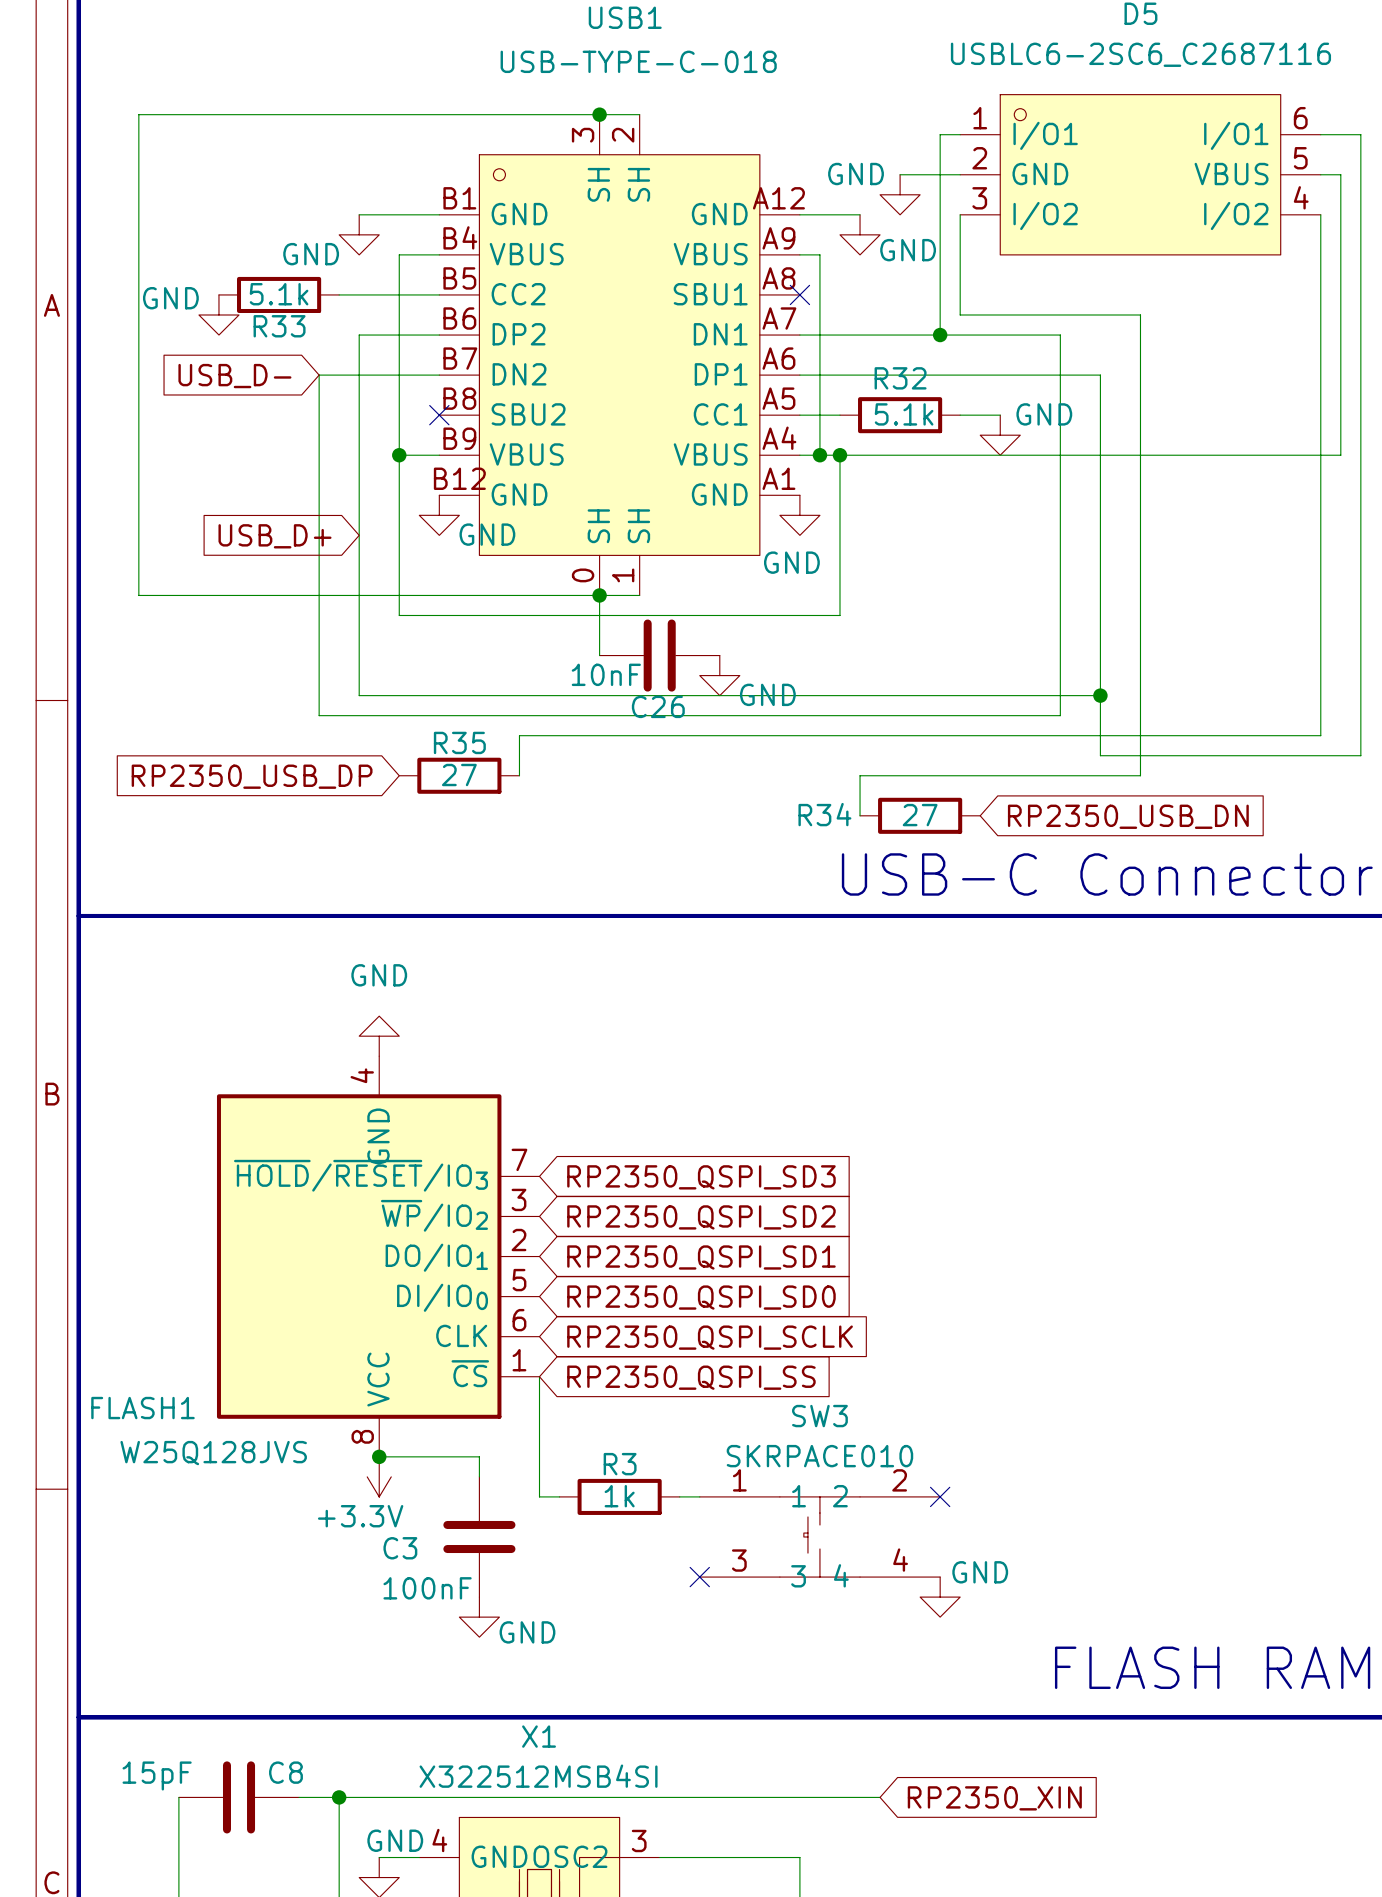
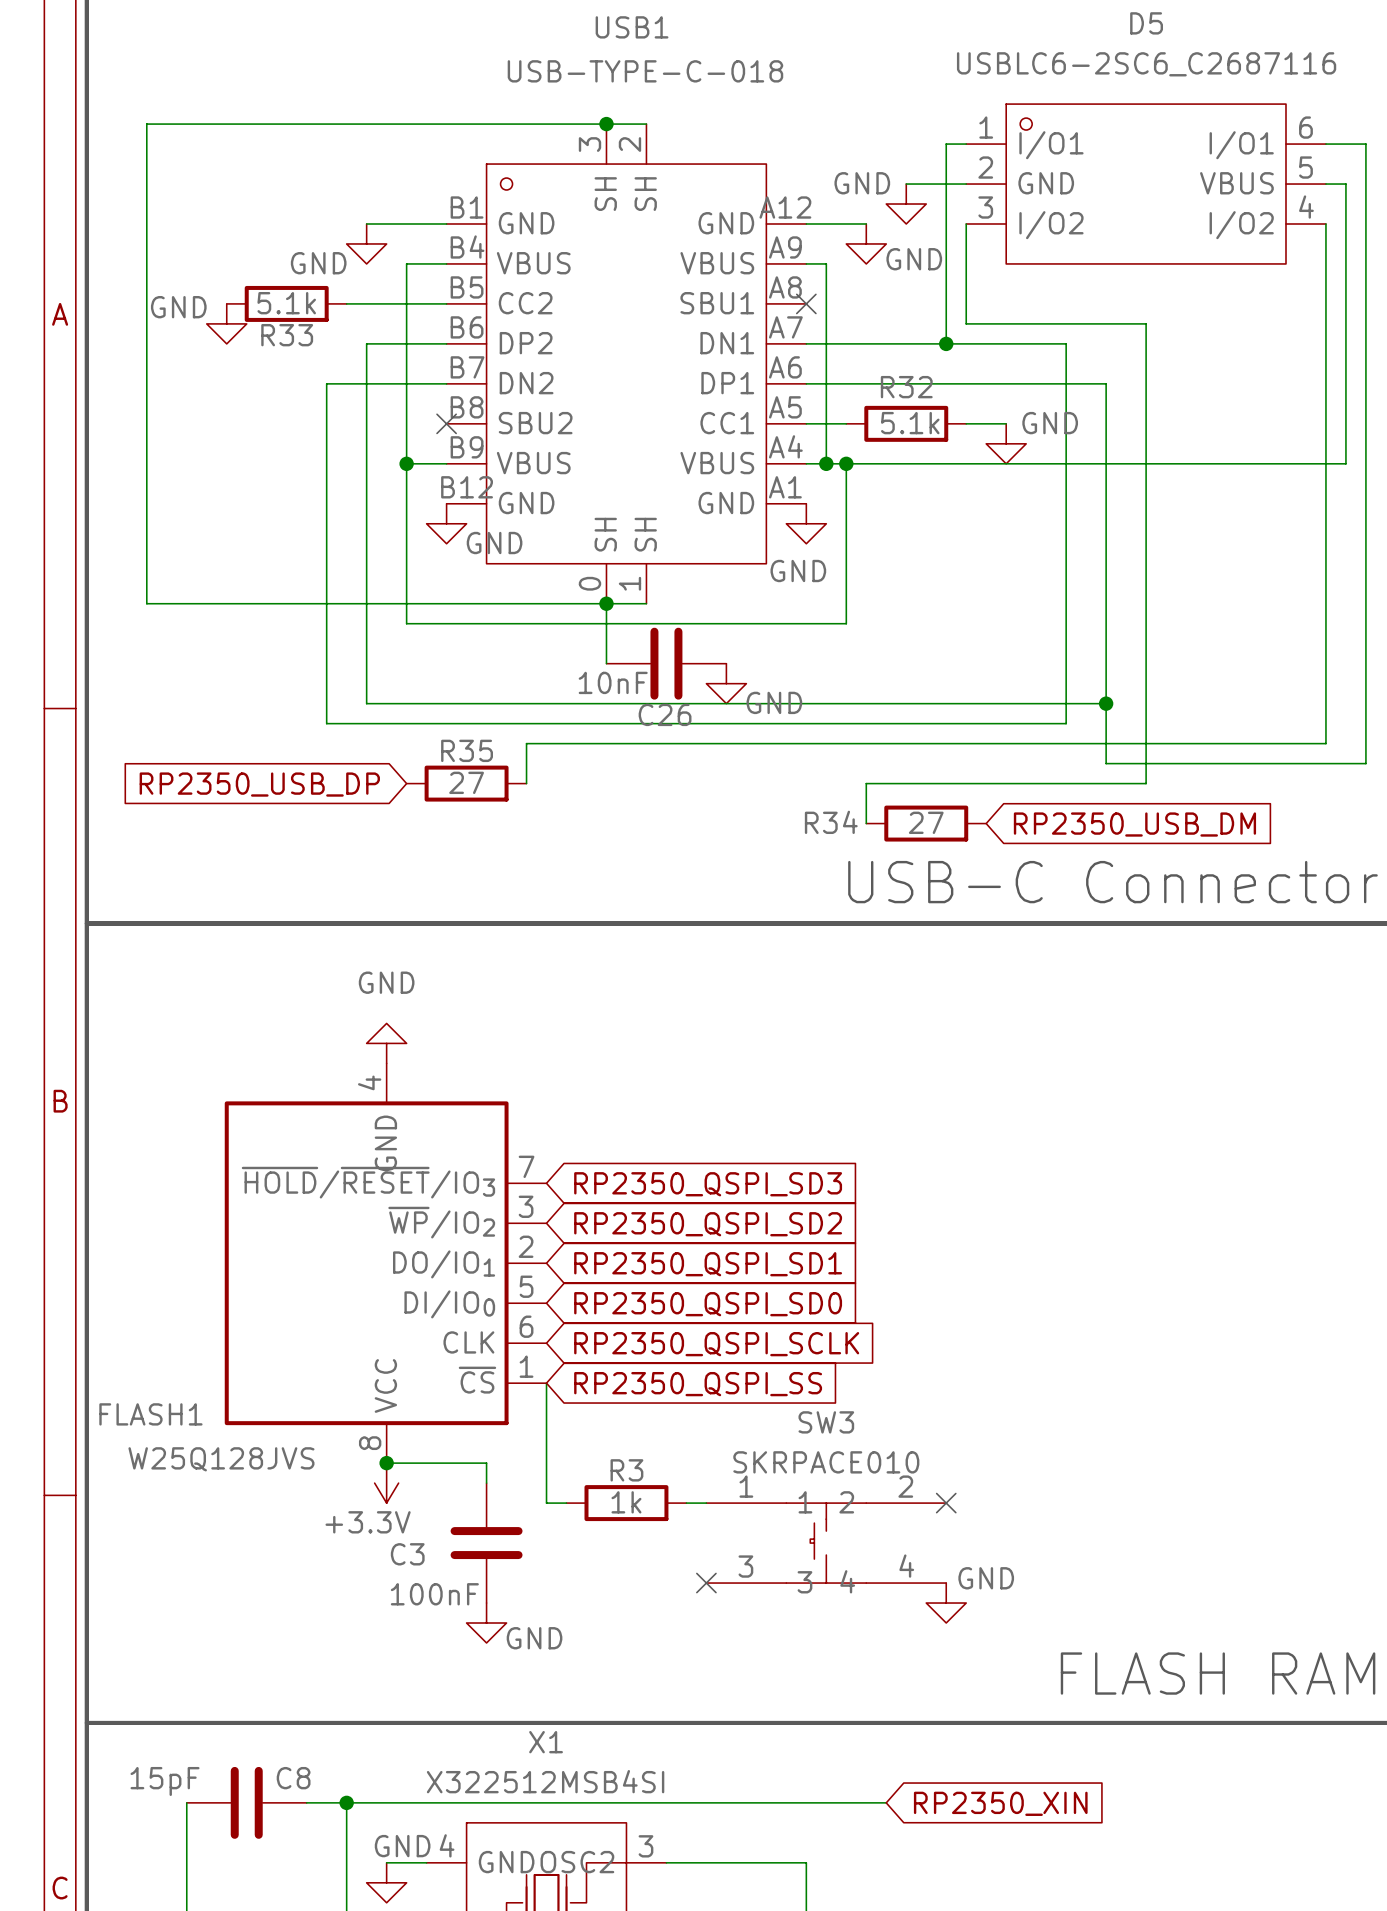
global label: USB_D- (234, 376) -> none
global label: USB_D+ (274, 536) -> none
global label: RP2350_USB_DN (1128, 816) -> RP2350_USB_DM (1134, 824)

